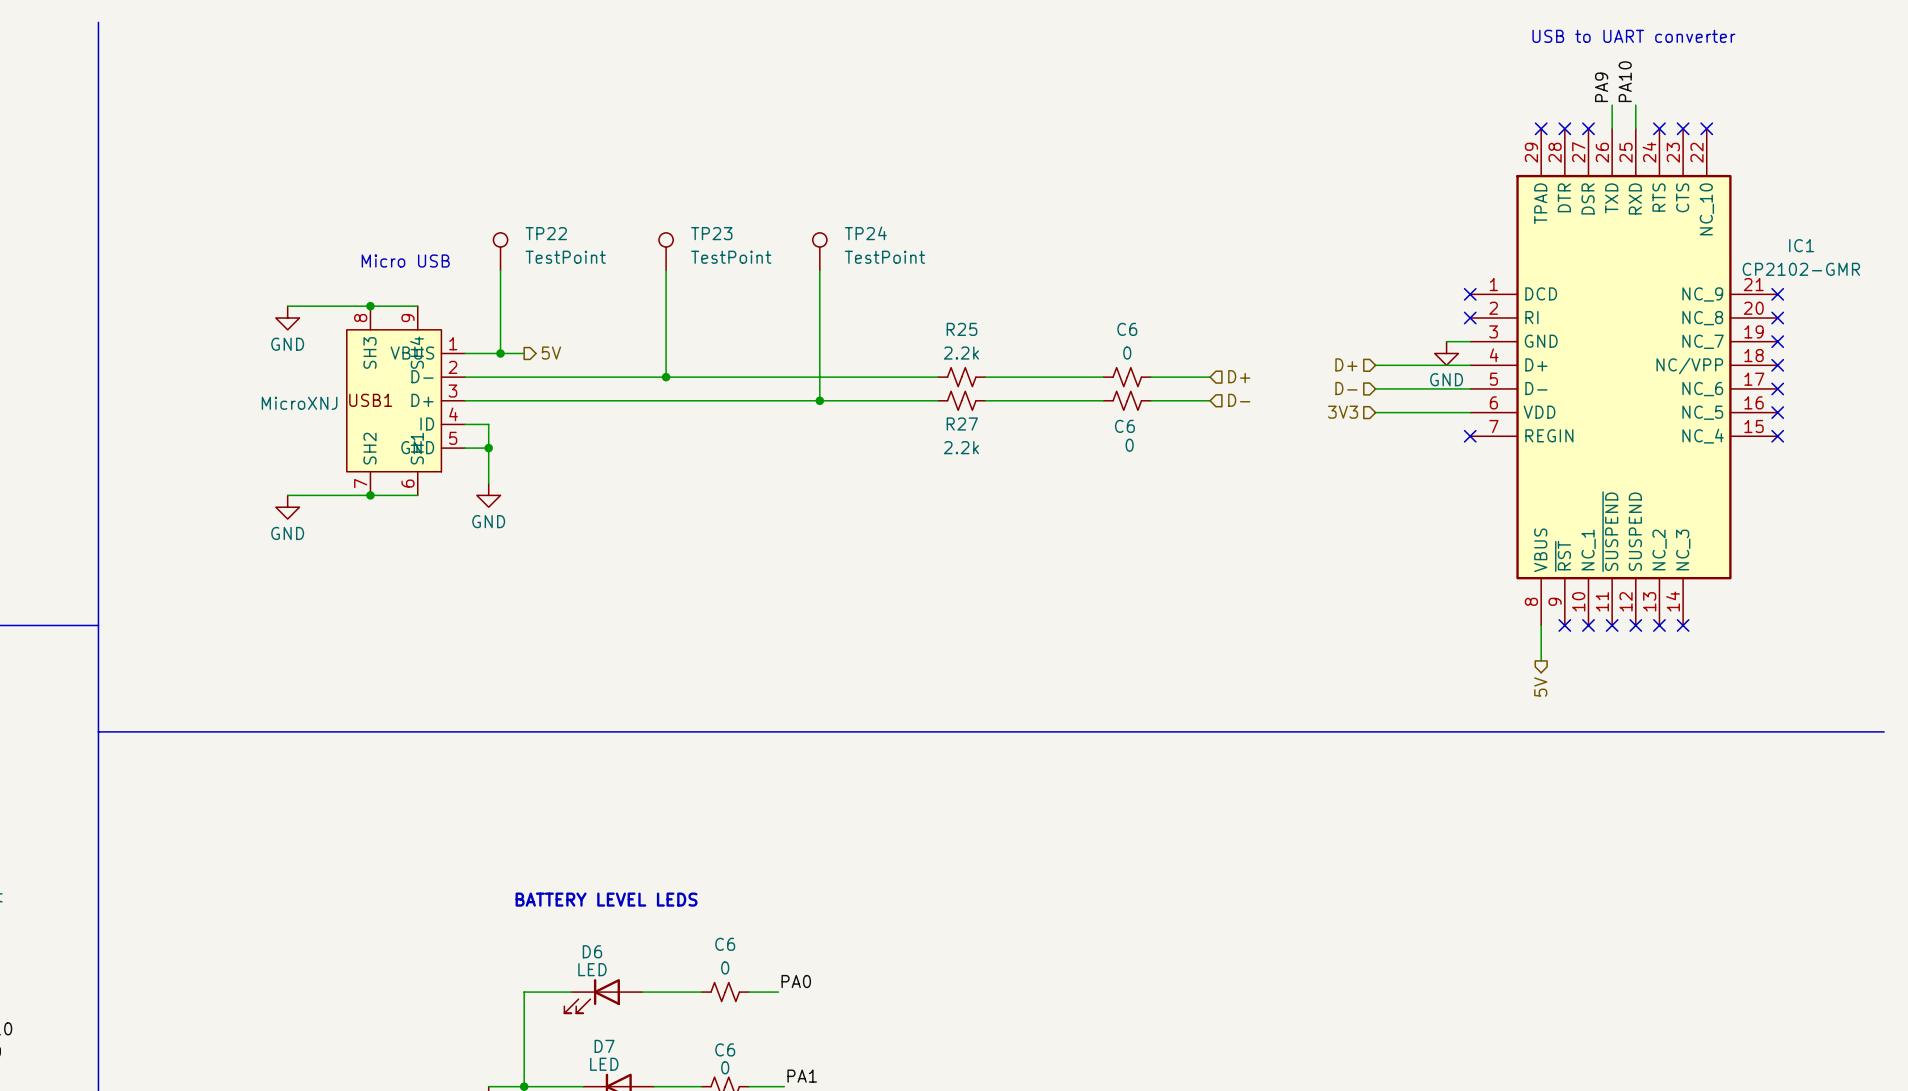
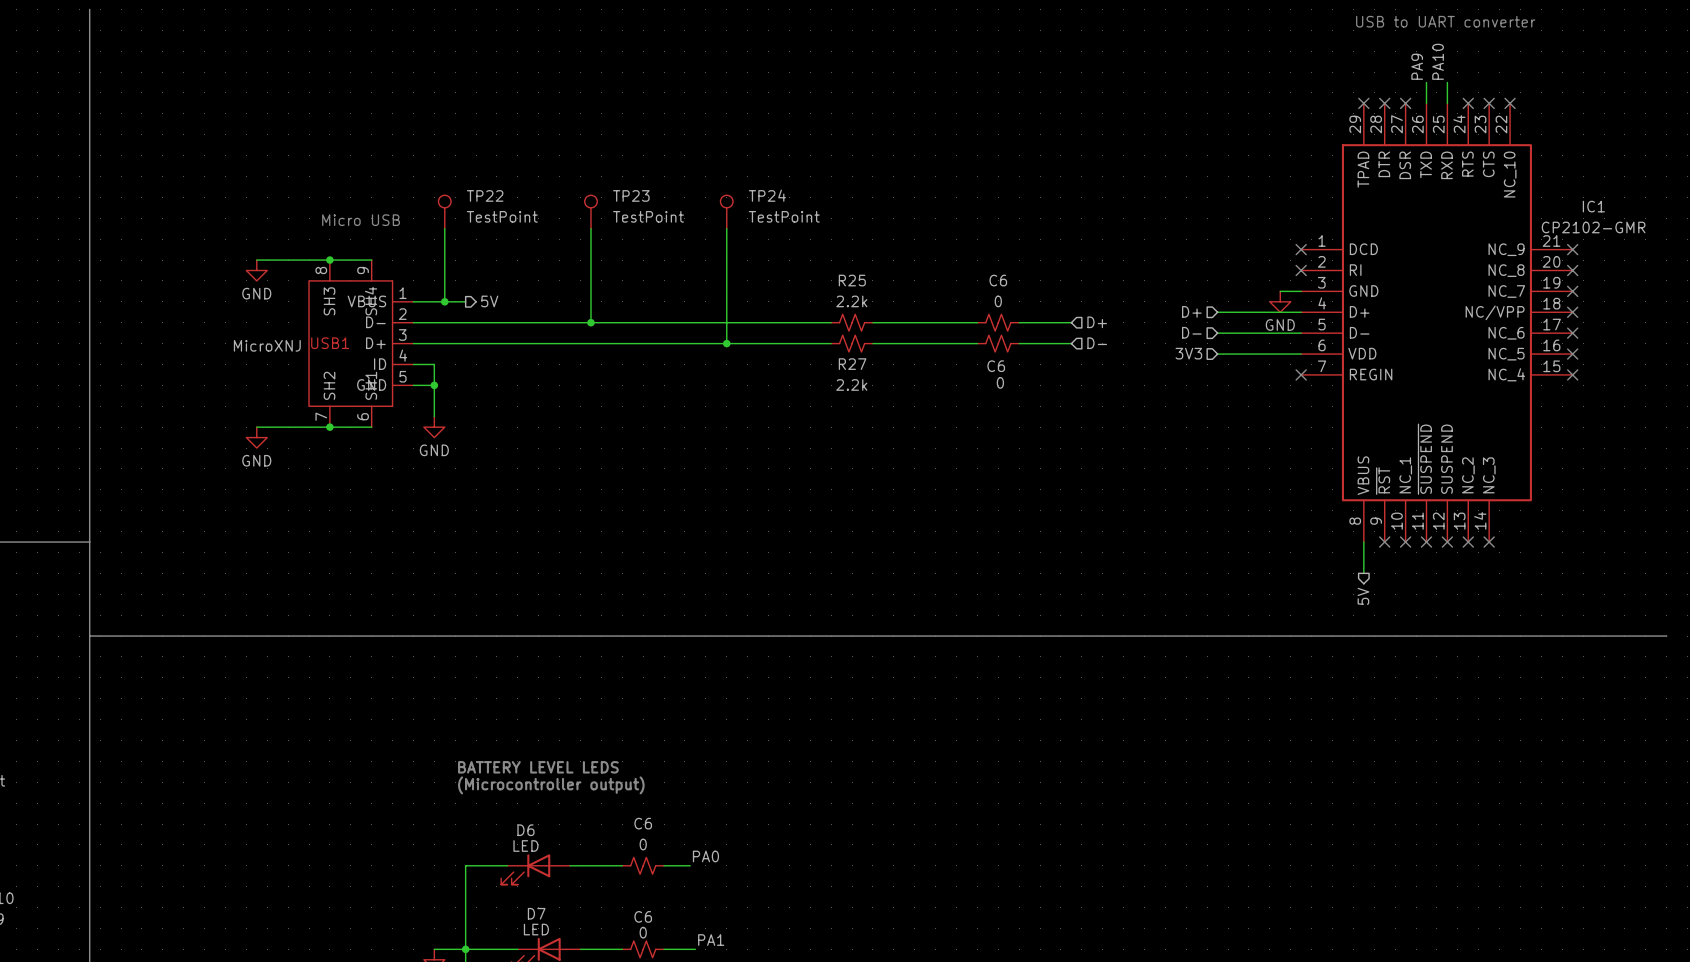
text: none -> BATTERY LEVEL LEDS (538, 767)
text: BATTERY LEVEL LEDS (606, 899) -> (Microcontroller output) (551, 785)

